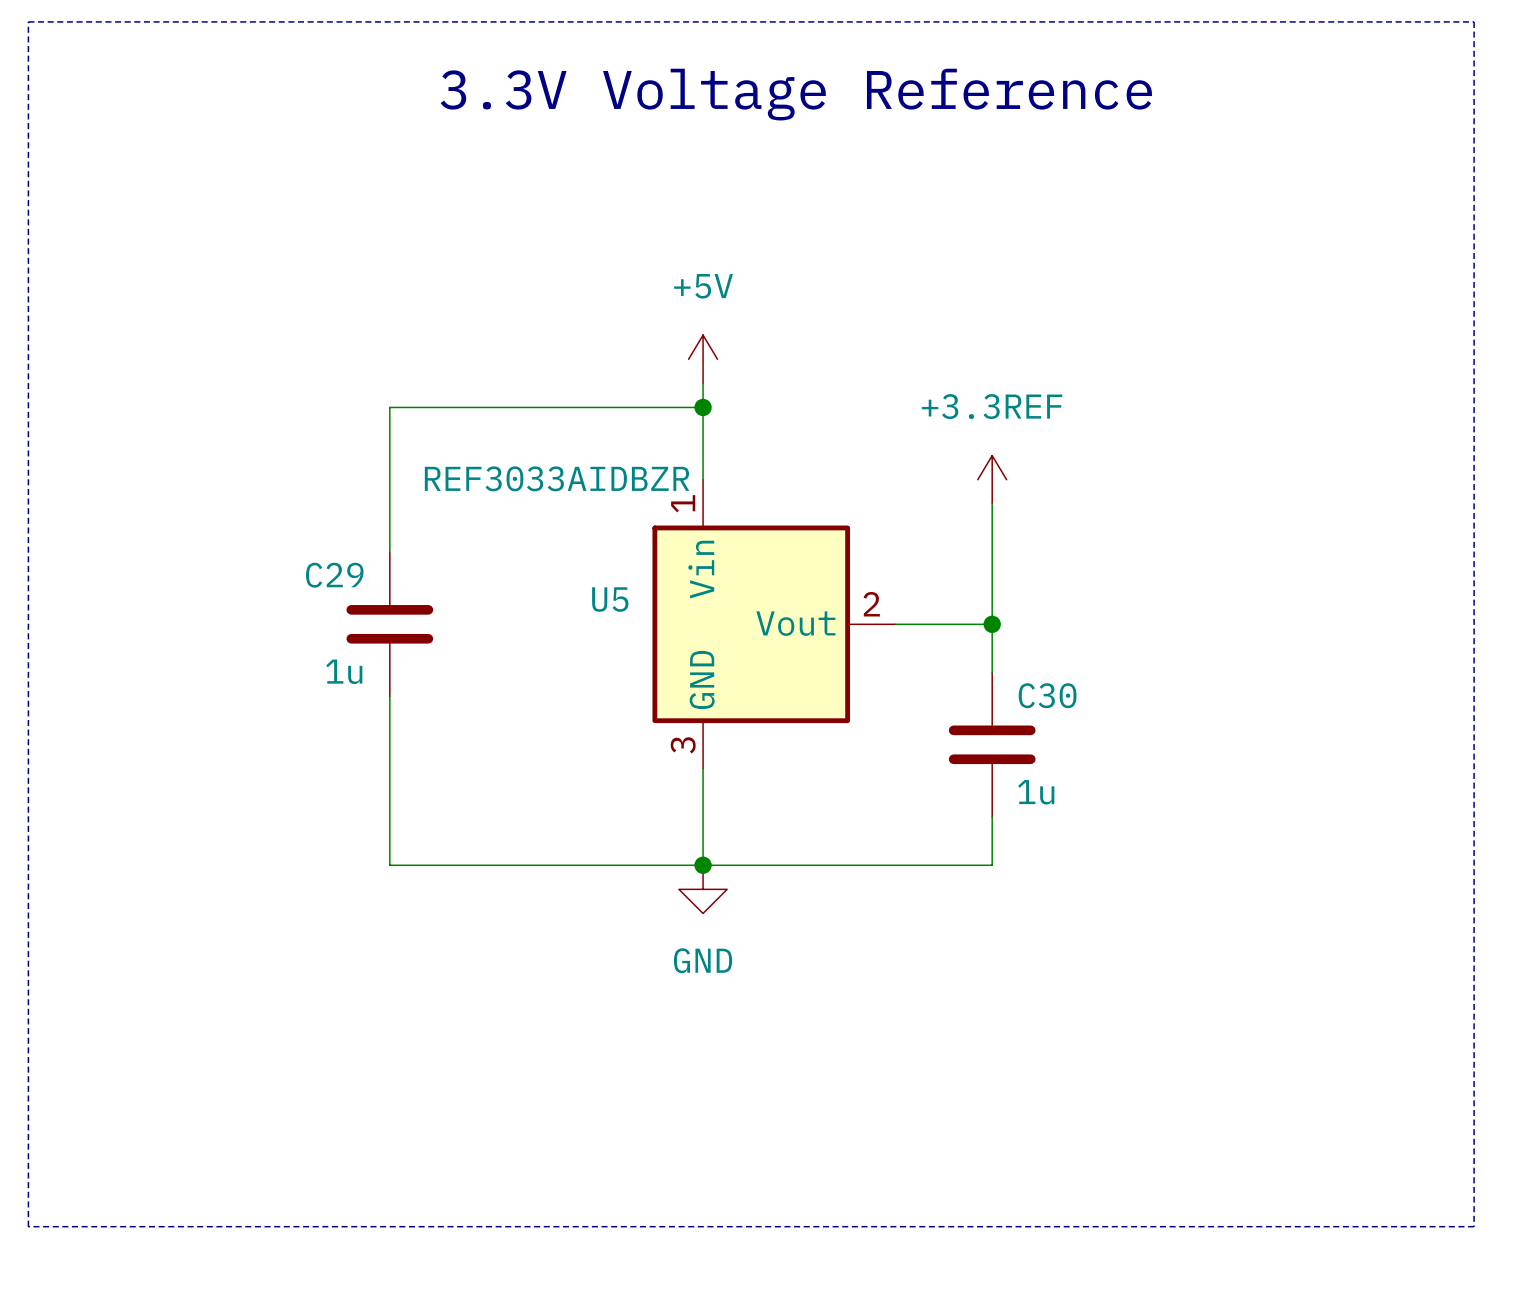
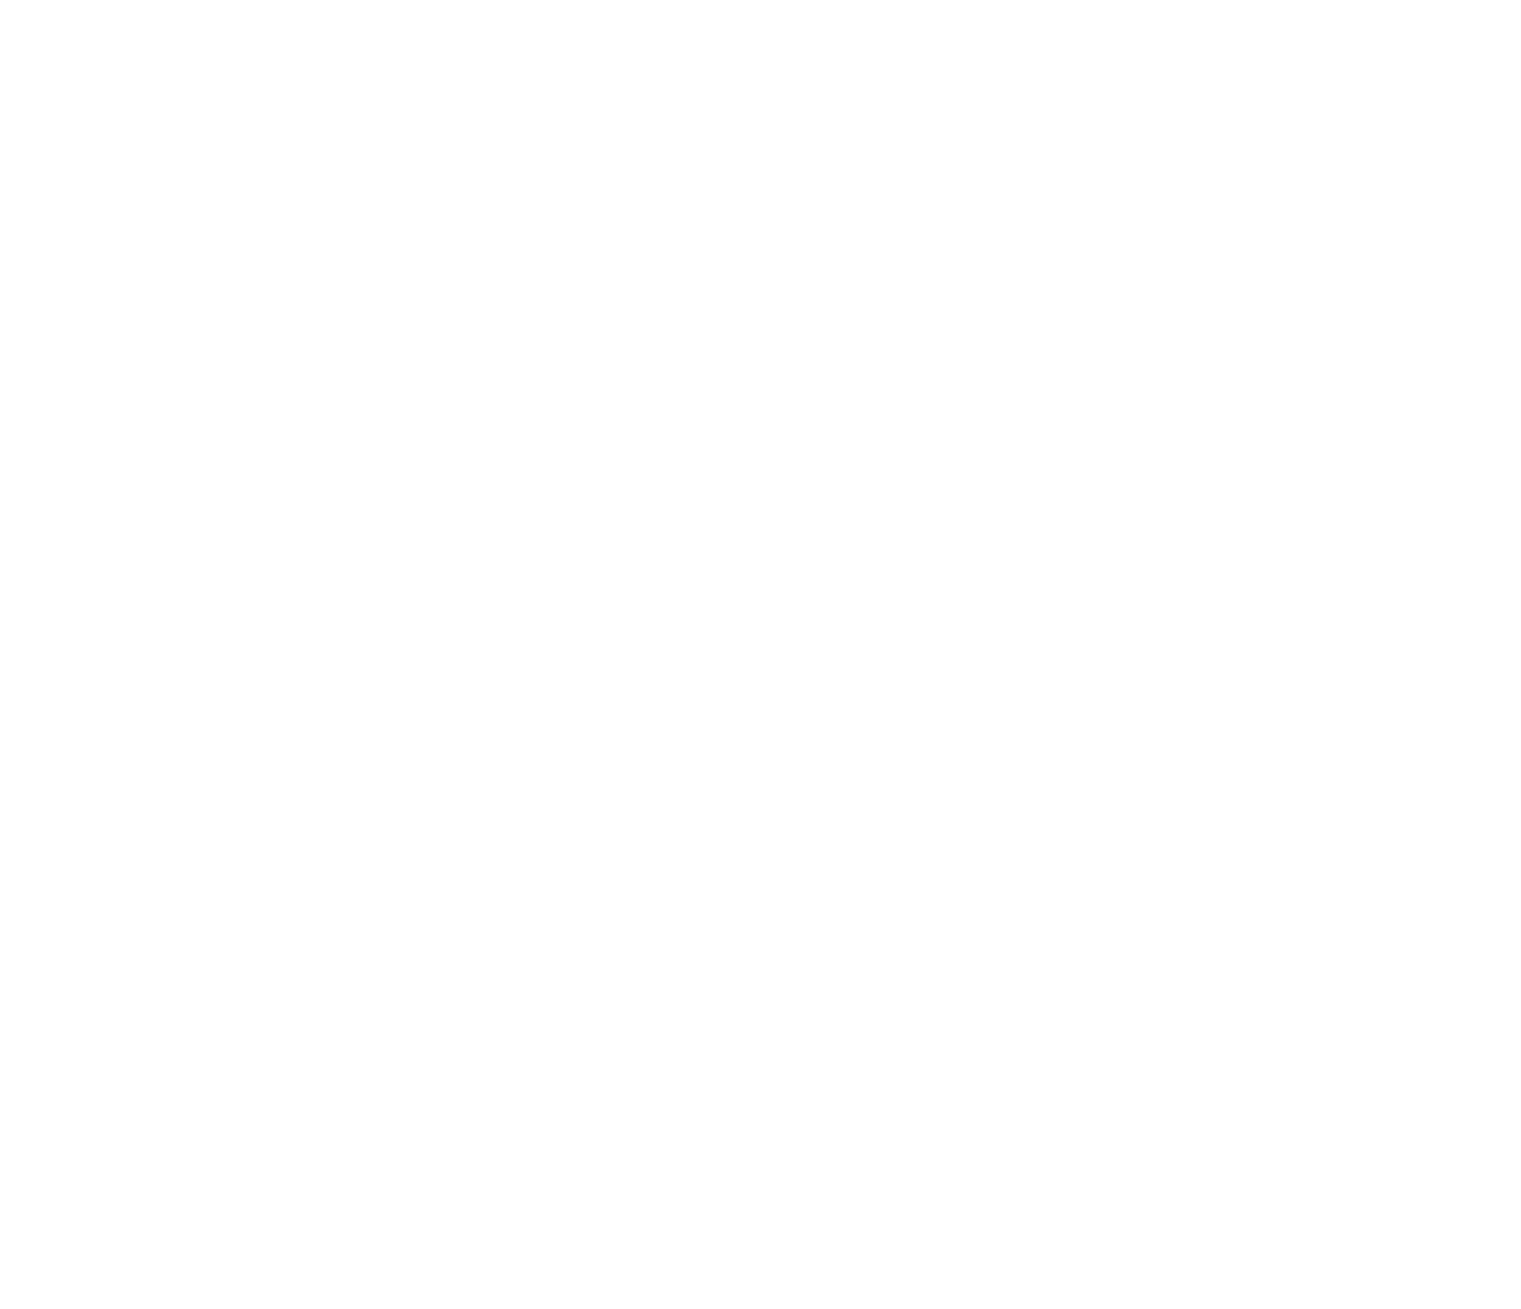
line: (28, 21) (1474, 21) (1474, 1226) (28, 1226) (28, 21) -> none
text: 3.3V Voltage Reference (796, 94) -> none
power symbol: +5V (703, 359) -> none
wire: (703, 383) (703, 479) -> none
wire: (703, 407) (389, 407) (389, 552) -> none
junction: (703, 407) -> none
power symbol: +3.3REF (992, 479) -> none
wire: (992, 503) (992, 672) -> none
C29: 1u (389, 624) -> none
U5: REF3033AIDBZR (774, 624) -> none
wire: (895, 624) (992, 624) -> none
junction: (992, 624) -> none
wire: (389, 696) (389, 865) (992, 865) (992, 817) -> none
C30: 1u (992, 744) -> none
wire: (703, 768) (703, 865) -> none
junction: (703, 865) -> none
power symbol: GND (703, 889) -> none

